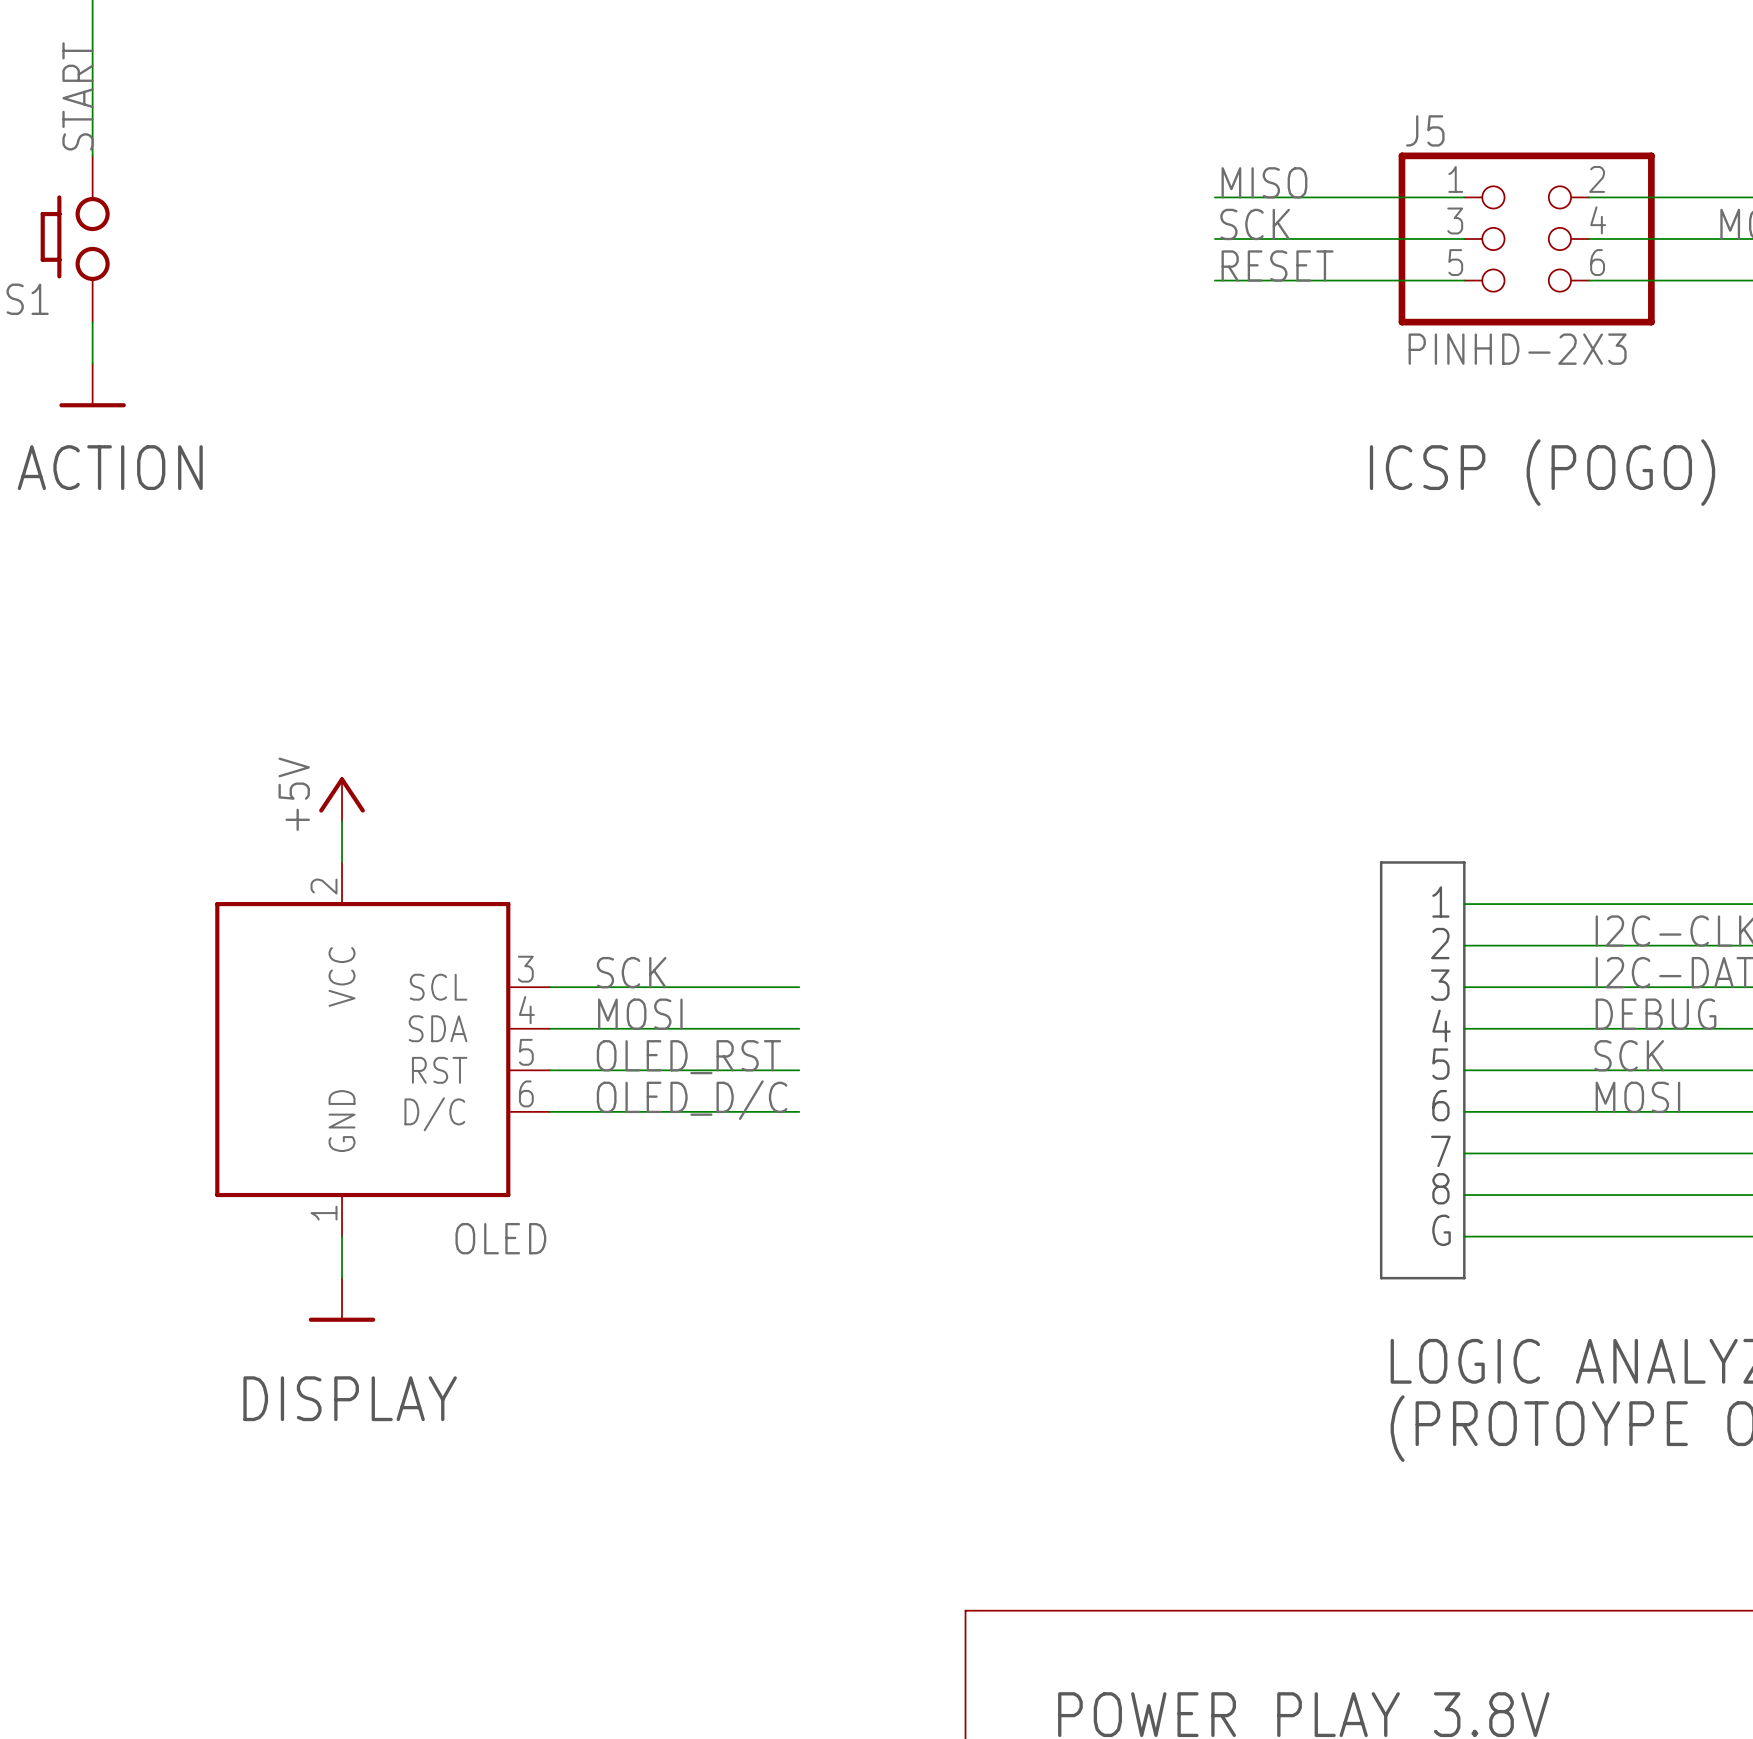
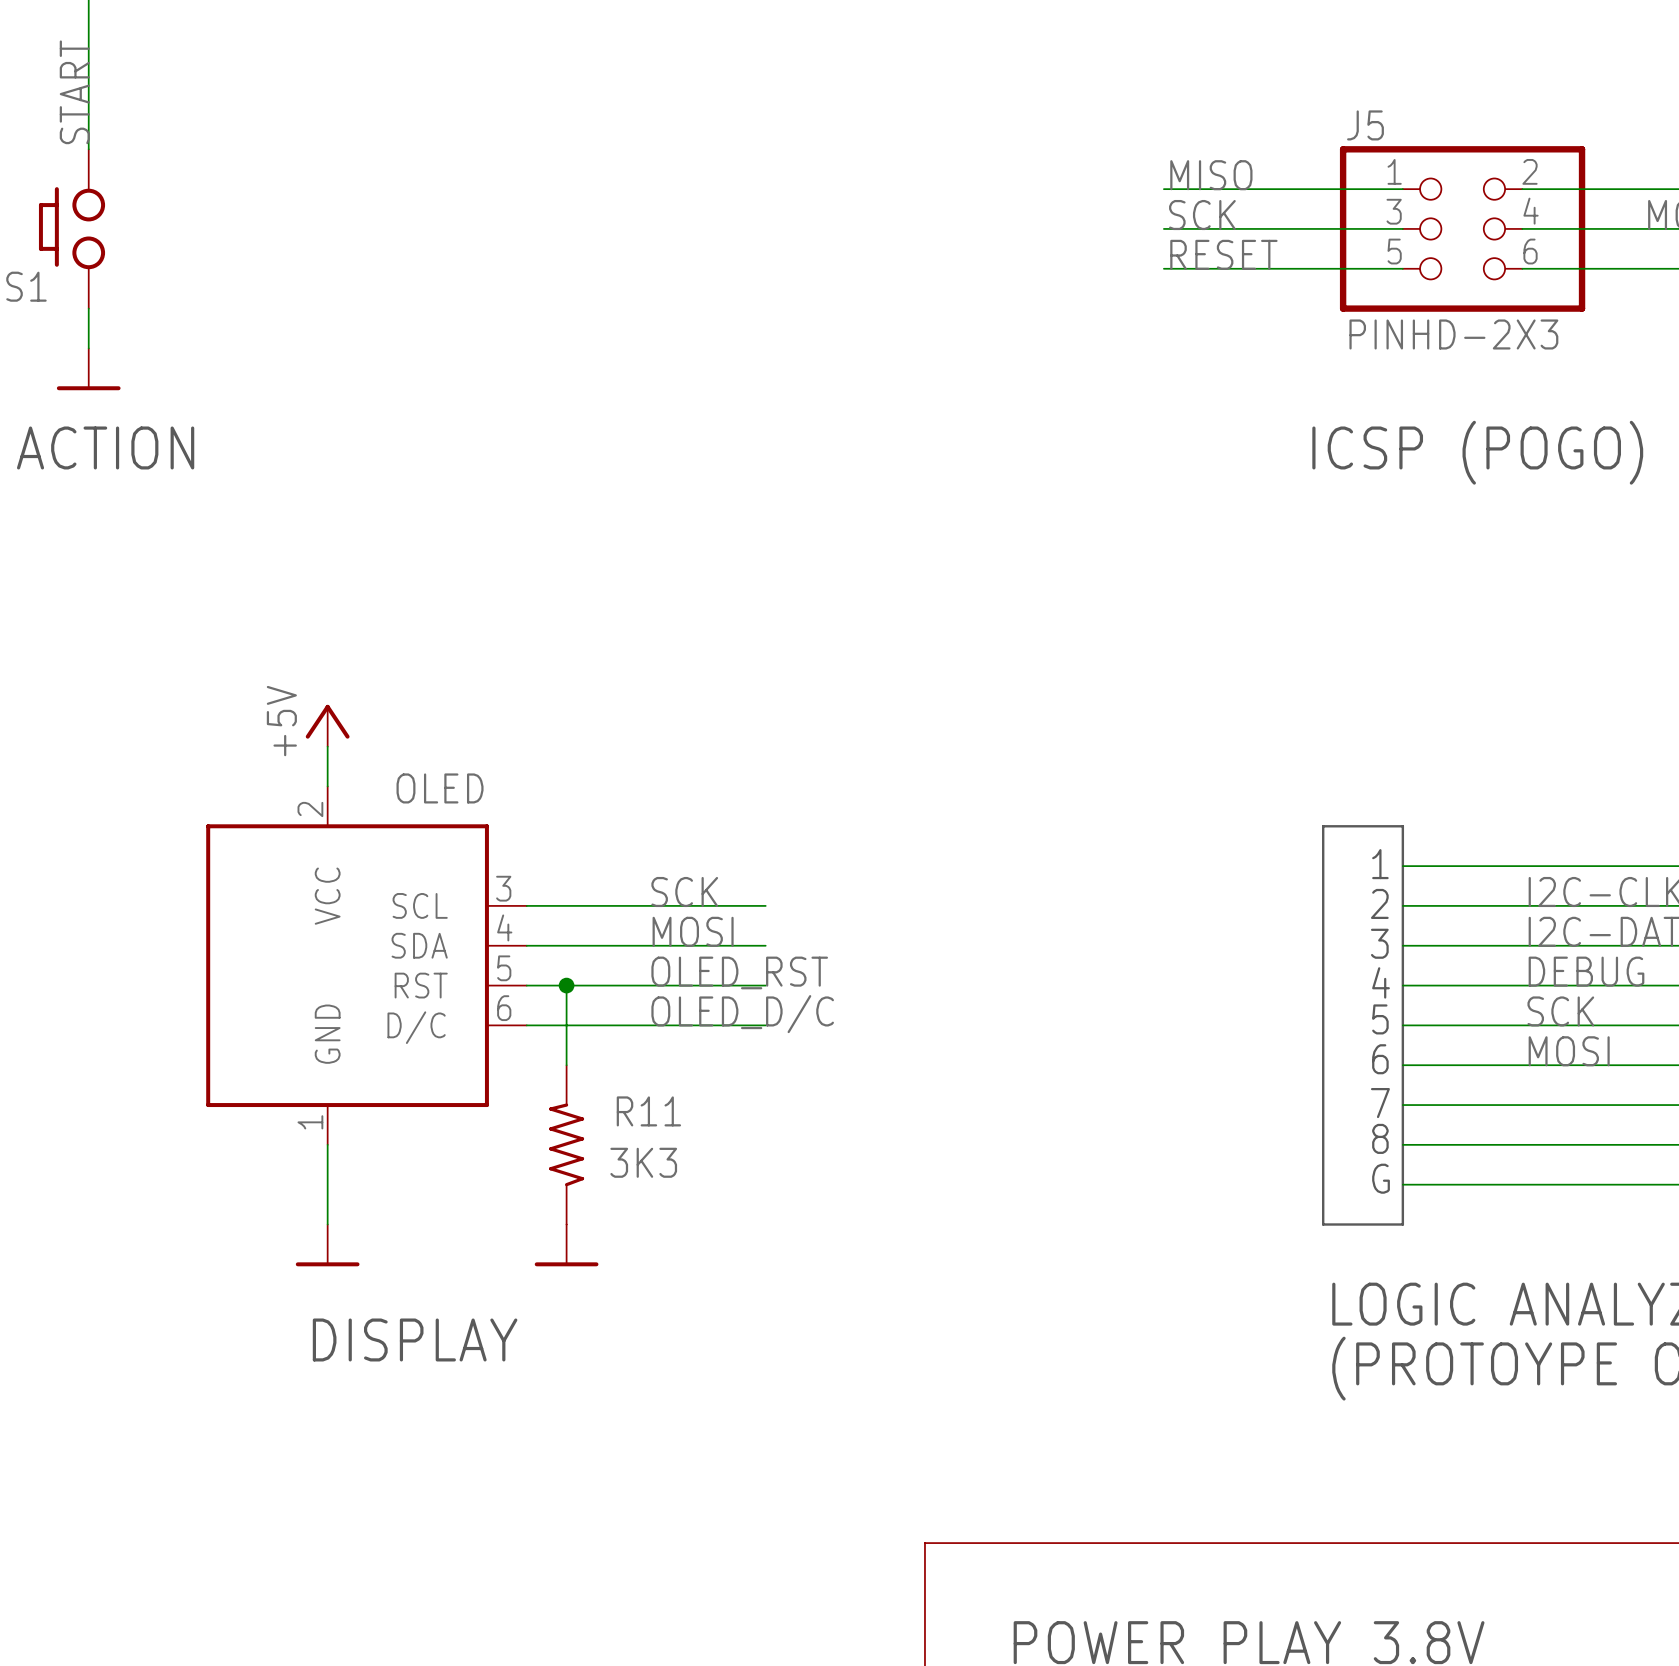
power symbol position: +5V (342, 799) -> +5V (327, 725)
label position: SCK (631, 972) -> SCK (684, 891)
label position: MOSI (640, 1014) -> MOSI (693, 931)
wire: none -> (566, 985) (566, 1065)
junction: none -> (566, 985)
OLED position: (382, 1049) -> (366, 965)
label position: OLED_RST (688, 1057) -> OLED_RST (739, 972)
label position: OLED_D/C (692, 1100) -> OLED_D/C (742, 1014)
wire: (549, 1111) (799, 1111) -> (526, 905) (765, 905)
R11: none -> 3K3 (566, 1144)
OLED name position: OLED (500, 1238) -> OLED (440, 788)
power symbol: none -> (566, 1245)
text position: DISPLAY (350, 1398) -> DISPLAY (415, 1339)

